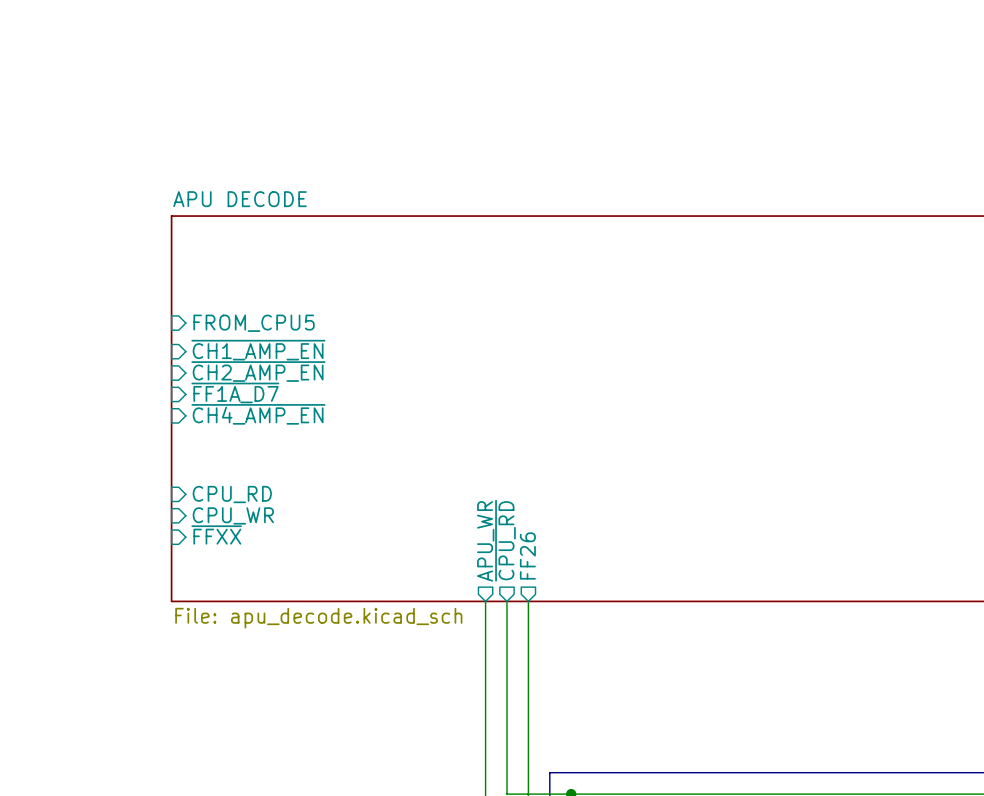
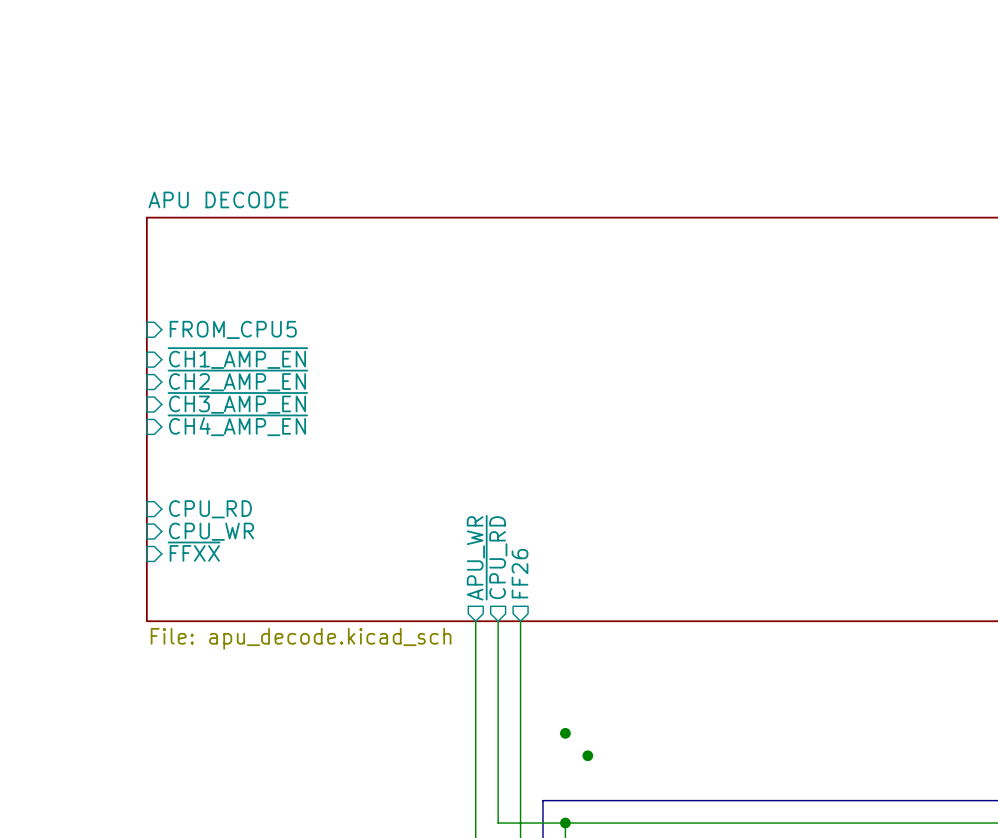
sheet pin: ~{FF1A_D7} (235, 392) -> ~{CH3_AMP_EN} (237, 402)
junction: none -> (565, 733)
junction: none -> (587, 755)

